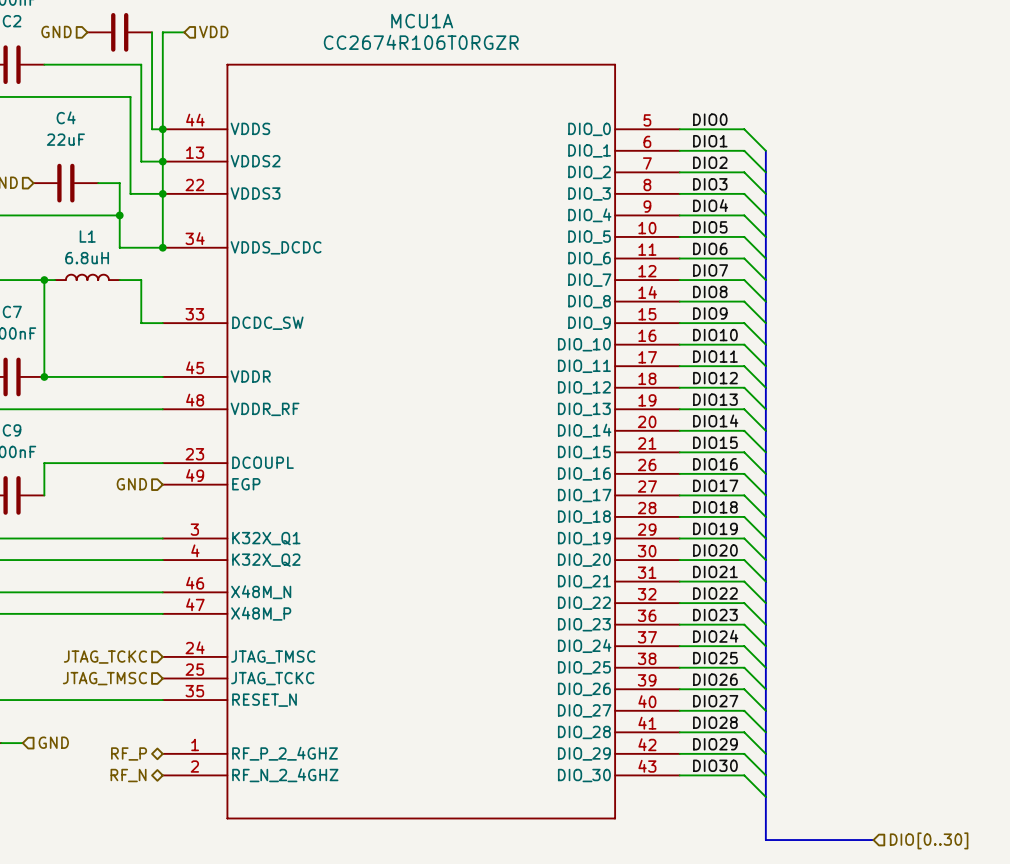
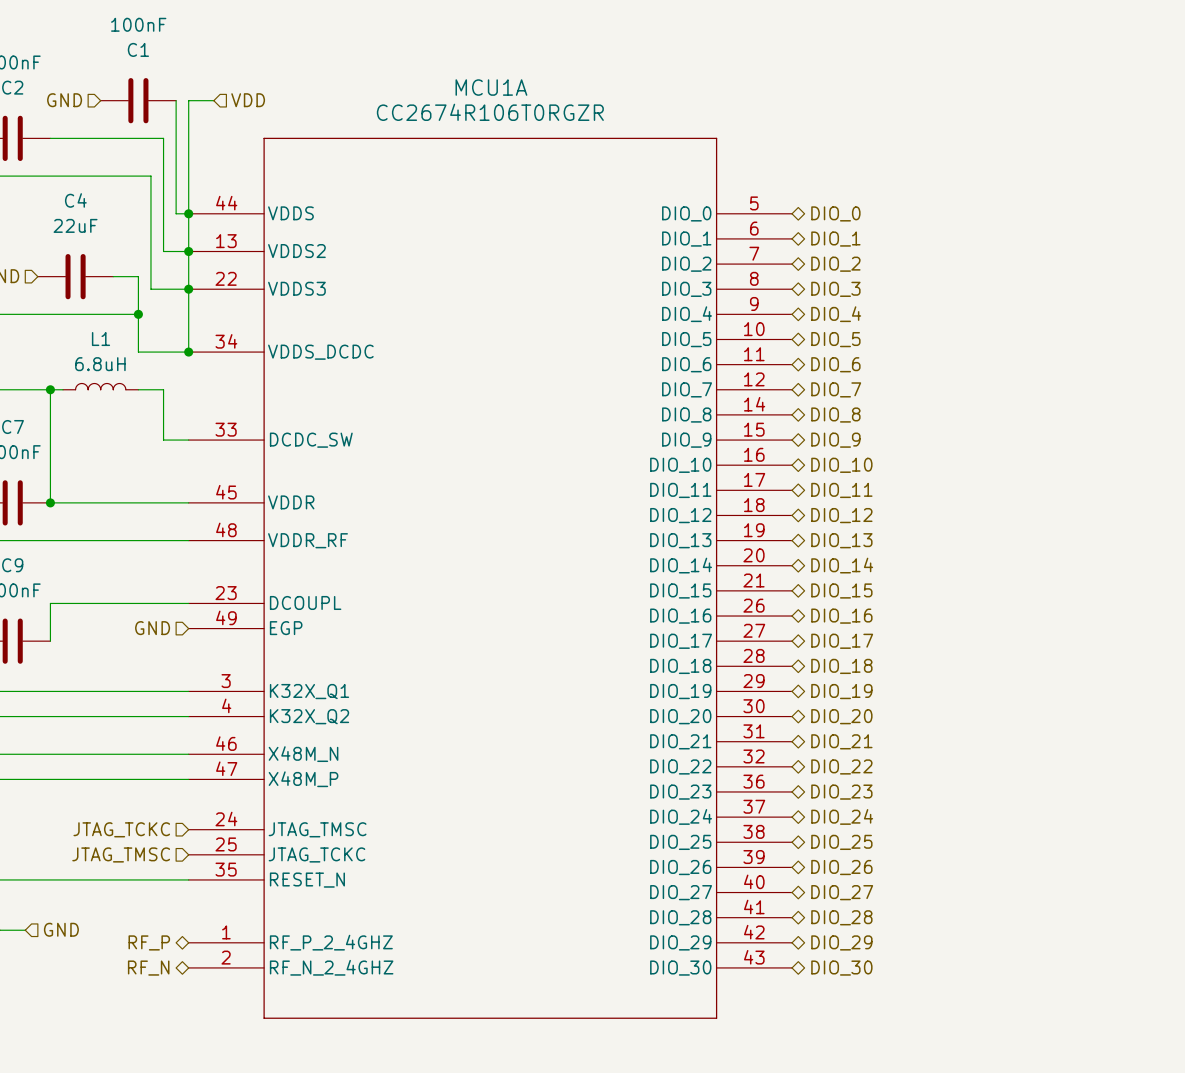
label: DIO0 (710, 119) -> none
wire: (679, 129) (744, 129) (765, 150) -> none
hierarchical label: none -> DIO_0 (835, 213)
label: DIO1 (710, 141) -> none
wire: (679, 150) (744, 150) (765, 172) -> none
hierarchical label: none -> DIO_1 (835, 239)
bus: (765, 150) (765, 840) (873, 840) -> none
label: DIO2 (710, 162) -> none
wire: (679, 172) (744, 172) (765, 193) -> none
hierarchical label: none -> DIO_2 (835, 264)
label: DIO3 (710, 184) -> none
wire: (679, 193) (744, 193) (765, 215) -> none
hierarchical label: none -> DIO_3 (835, 289)
label: DIO4 (710, 205) -> none
wire: (679, 215) (744, 215) (765, 236) -> none
hierarchical label: none -> DIO_4 (836, 314)
label: DIO5 (710, 227) -> none
wire: (679, 236) (744, 236) (765, 258) -> none
hierarchical label: none -> DIO_5 (835, 339)
label: DIO6 (710, 248) -> none
wire: (679, 258) (744, 258) (765, 280) -> none
hierarchical label: none -> DIO_6 (835, 364)
label: DIO7 (710, 270) -> none
wire: (679, 280) (744, 280) (765, 301) -> none
hierarchical label: none -> DIO_7 (836, 389)
label: DIO8 (710, 291) -> none
wire: (679, 301) (744, 301) (765, 323) -> none
hierarchical label: none -> DIO_8 (835, 415)
label: DIO9 (710, 313) -> none
wire: (679, 323) (744, 323) (765, 344) -> none
hierarchical label: none -> DIO_9 (835, 440)
label: DIO10 (715, 335) -> none
wire: (679, 344) (744, 344) (765, 366) -> none
hierarchical label: none -> DIO_10 (841, 465)
label: DIO11 (715, 356) -> none
wire: (679, 366) (744, 366) (765, 387) -> none
hierarchical label: none -> DIO_11 (841, 490)
label: DIO12 (715, 378) -> none
wire: (679, 387) (744, 387) (765, 409) -> none
hierarchical label: none -> DIO_12 (841, 515)
label: DIO13 (715, 399) -> none
wire: (679, 409) (744, 409) (765, 430) -> none
hierarchical label: none -> DIO_13 (841, 540)
label: DIO14 (715, 420) -> none
wire: (679, 430) (744, 430) (765, 452) -> none
hierarchical label: none -> DIO_14 (842, 565)
label: DIO15 (715, 442) -> none
wire: (679, 452) (744, 452) (765, 473) -> none
hierarchical label: none -> DIO_15 (841, 591)
label: DIO16 (715, 464) -> none
wire: (679, 473) (744, 473) (765, 495) -> none
hierarchical label: none -> DIO_16 (841, 616)
label: DIO17 (715, 485) -> none
wire: (679, 495) (744, 495) (765, 516) -> none
hierarchical label: none -> DIO_17 (842, 641)
label: DIO18 (715, 507) -> none
wire: (679, 516) (744, 516) (765, 538) -> none
hierarchical label: none -> DIO_18 (841, 666)
label: DIO19 (715, 528) -> none
wire: (679, 538) (744, 538) (765, 560) -> none
hierarchical label: none -> DIO_19 (841, 691)
label: DIO20 (715, 550) -> none
wire: (679, 560) (744, 560) (765, 581) -> none
hierarchical label: none -> DIO_20 (841, 716)
label: DIO21 (715, 571) -> none
wire: (679, 581) (744, 581) (765, 603) -> none
hierarchical label: none -> DIO_21 (841, 741)
label: DIO22 (715, 593) -> none
wire: (679, 603) (744, 603) (765, 624) -> none
hierarchical label: none -> DIO_22 (841, 766)
label: DIO23 (715, 615) -> none
wire: (679, 624) (744, 624) (765, 646) -> none
hierarchical label: none -> DIO_23 (841, 792)
label: DIO24 (715, 636) -> none
wire: (679, 646) (744, 646) (765, 667) -> none
hierarchical label: none -> DIO_24 (842, 816)
label: DIO25 (715, 658) -> none
wire: (679, 667) (744, 667) (765, 689) -> none
hierarchical label: none -> DIO_25 (841, 842)
label: DIO26 (715, 679) -> none
wire: (679, 689) (744, 689) (765, 710) -> none
hierarchical label: none -> DIO_26 (841, 867)
label: DIO27 (715, 701) -> none
wire: (679, 710) (744, 710) (765, 732) -> none
hierarchical label: none -> DIO_27 (842, 892)
label: DIO28 (715, 722) -> none
wire: (679, 732) (744, 732) (765, 753) -> none
hierarchical label: none -> DIO_28 (841, 917)
label: DIO29 (715, 744) -> none
wire: (679, 753) (744, 753) (765, 775) -> none
hierarchical label: none -> DIO_29 (841, 942)
label: DIO30 (715, 765) -> none
wire: (679, 775) (744, 775) (765, 796) -> none
hierarchical label: none -> DIO_30 (841, 968)
hierarchical label: DIO[0..30] (929, 840) -> none

